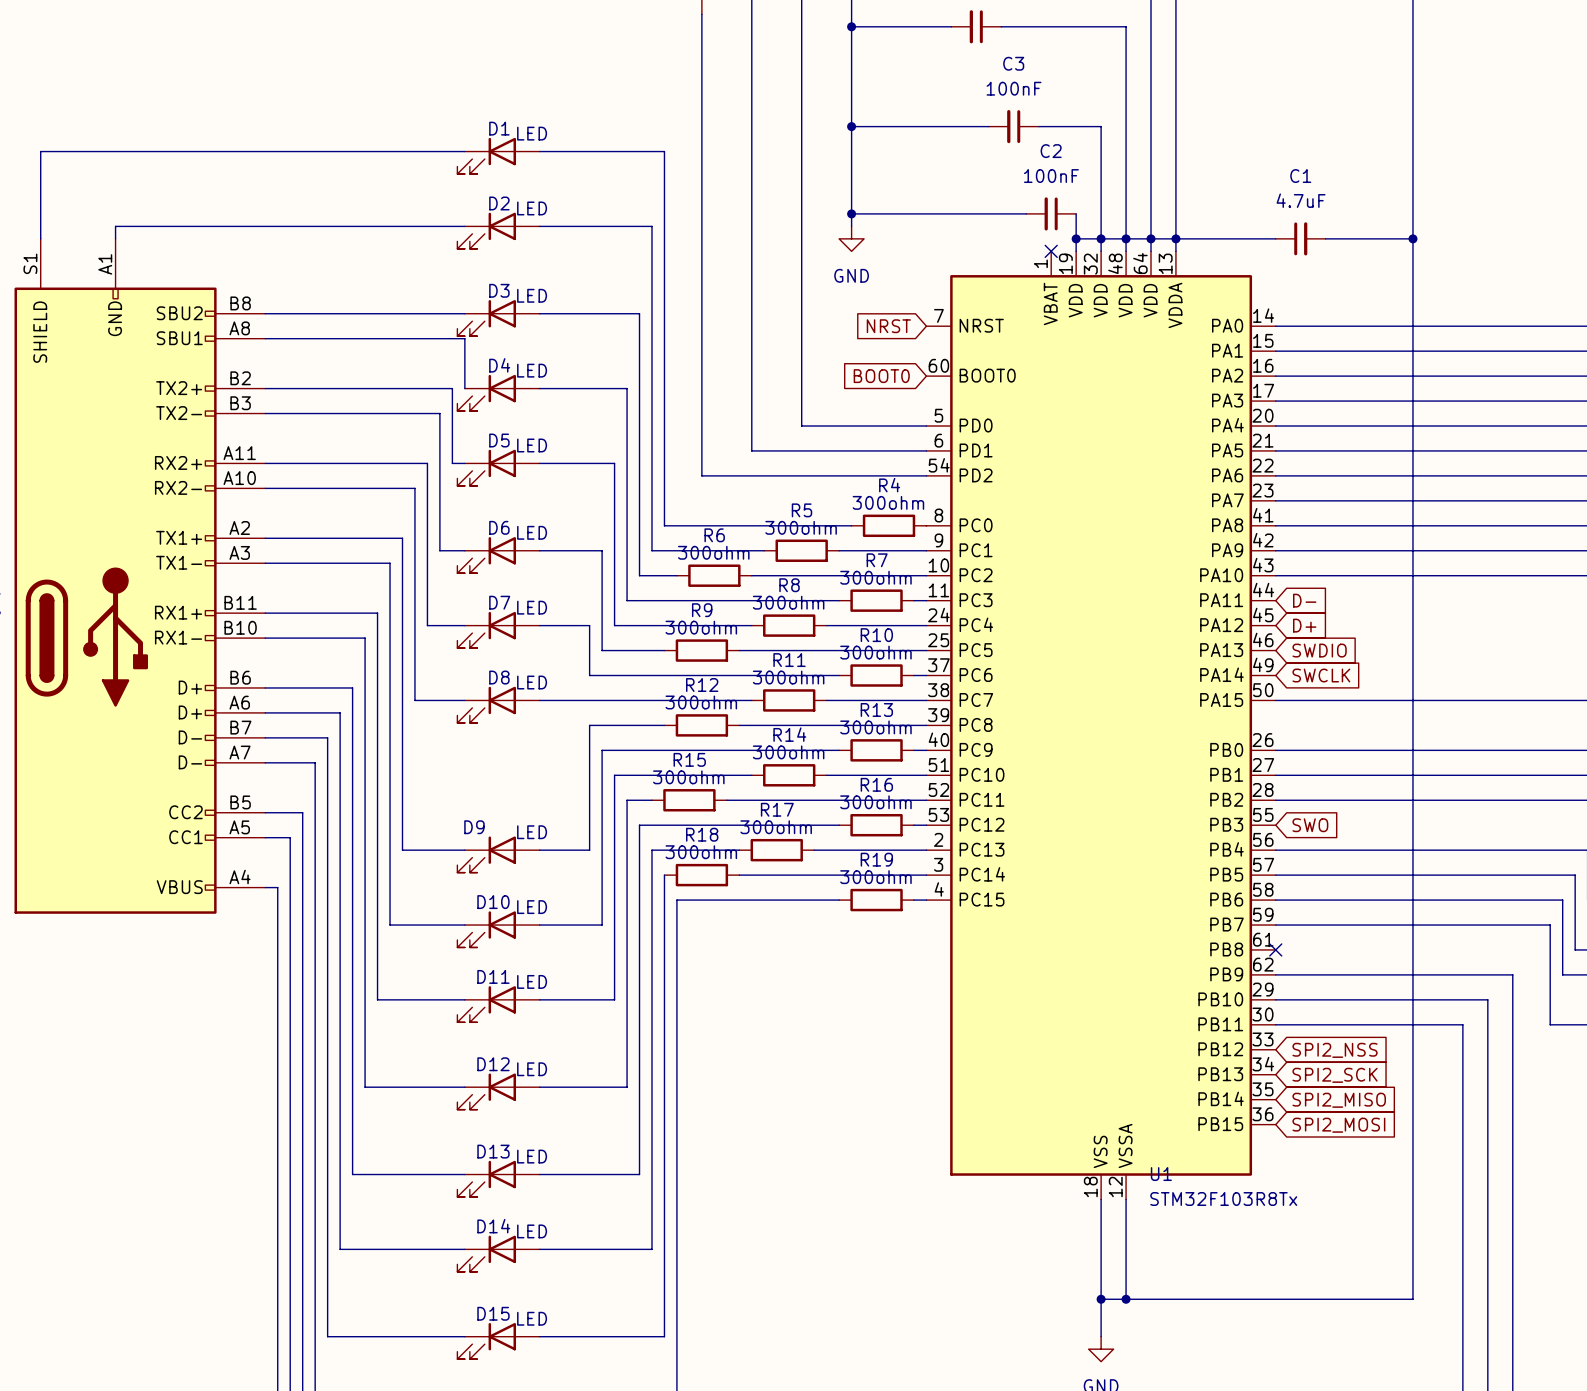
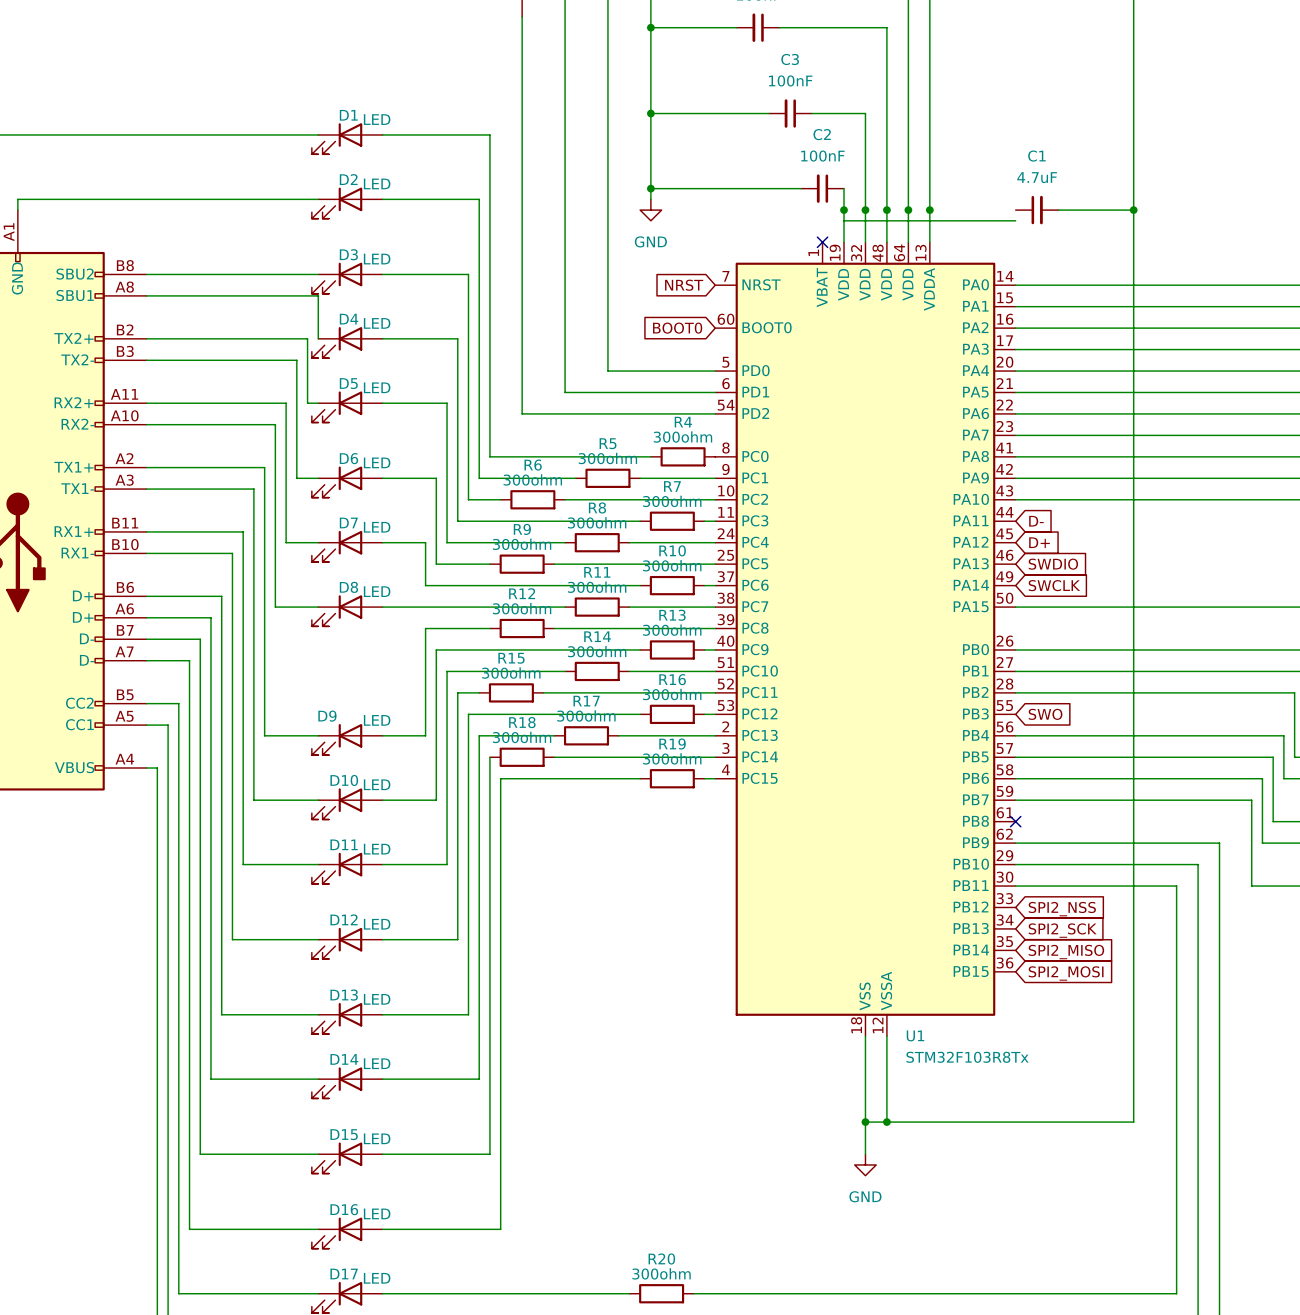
wire: (1076, 238) (1275, 238) -> none
U1 symbol: [926, 251, 1276, 1200] -> [715, 242, 1016, 1037]
no-connect mark position: (1051, 251) -> (822, 242)
wire: none -> (1015, 220) (844, 220) (844, 242)

